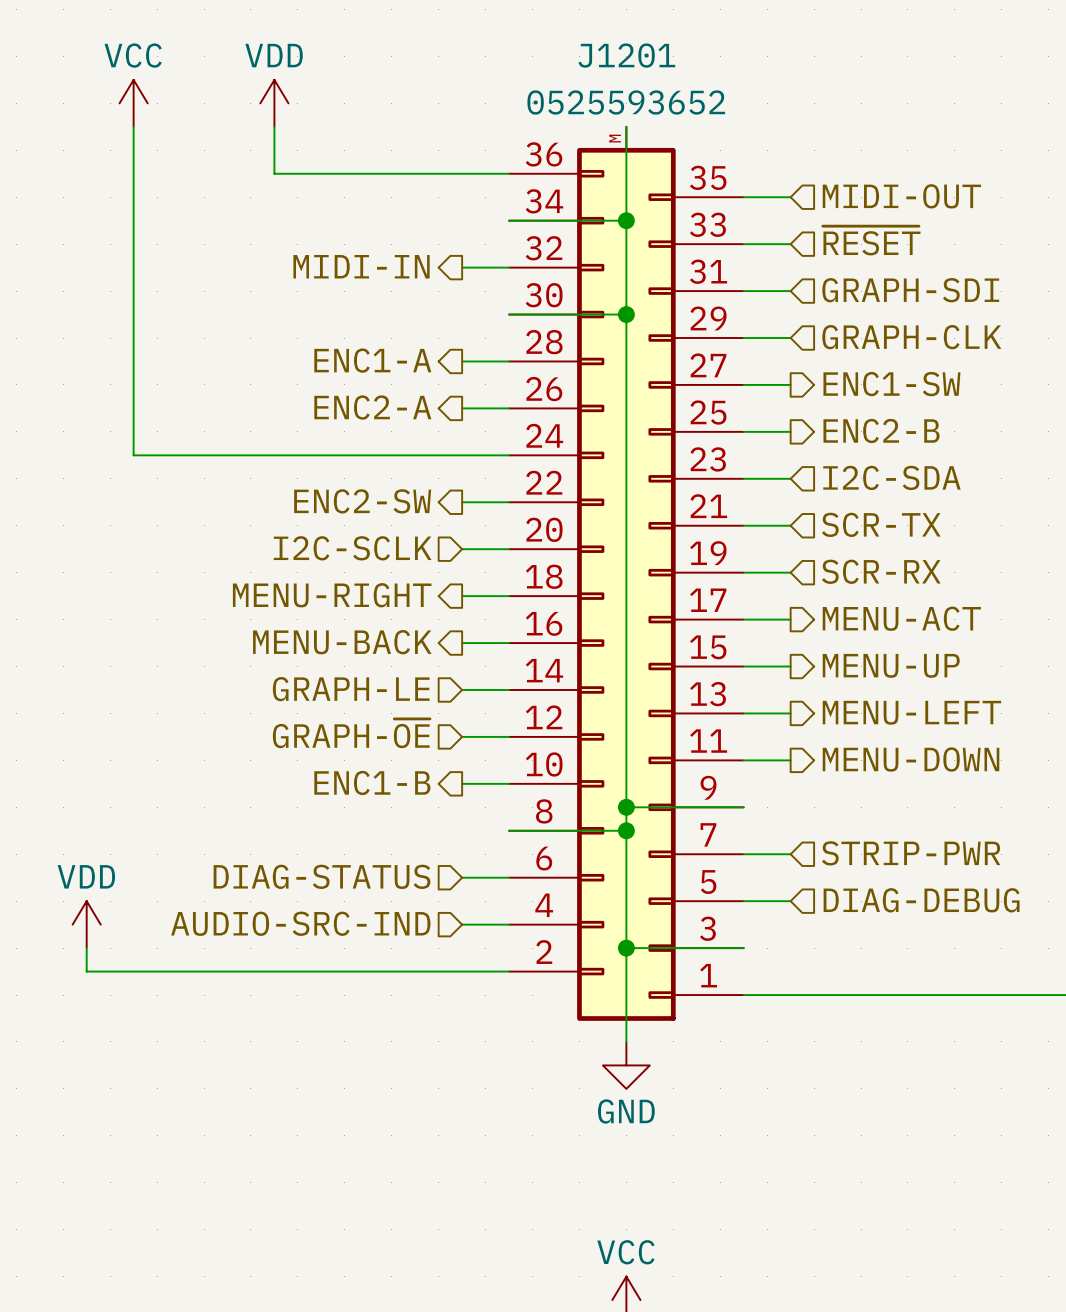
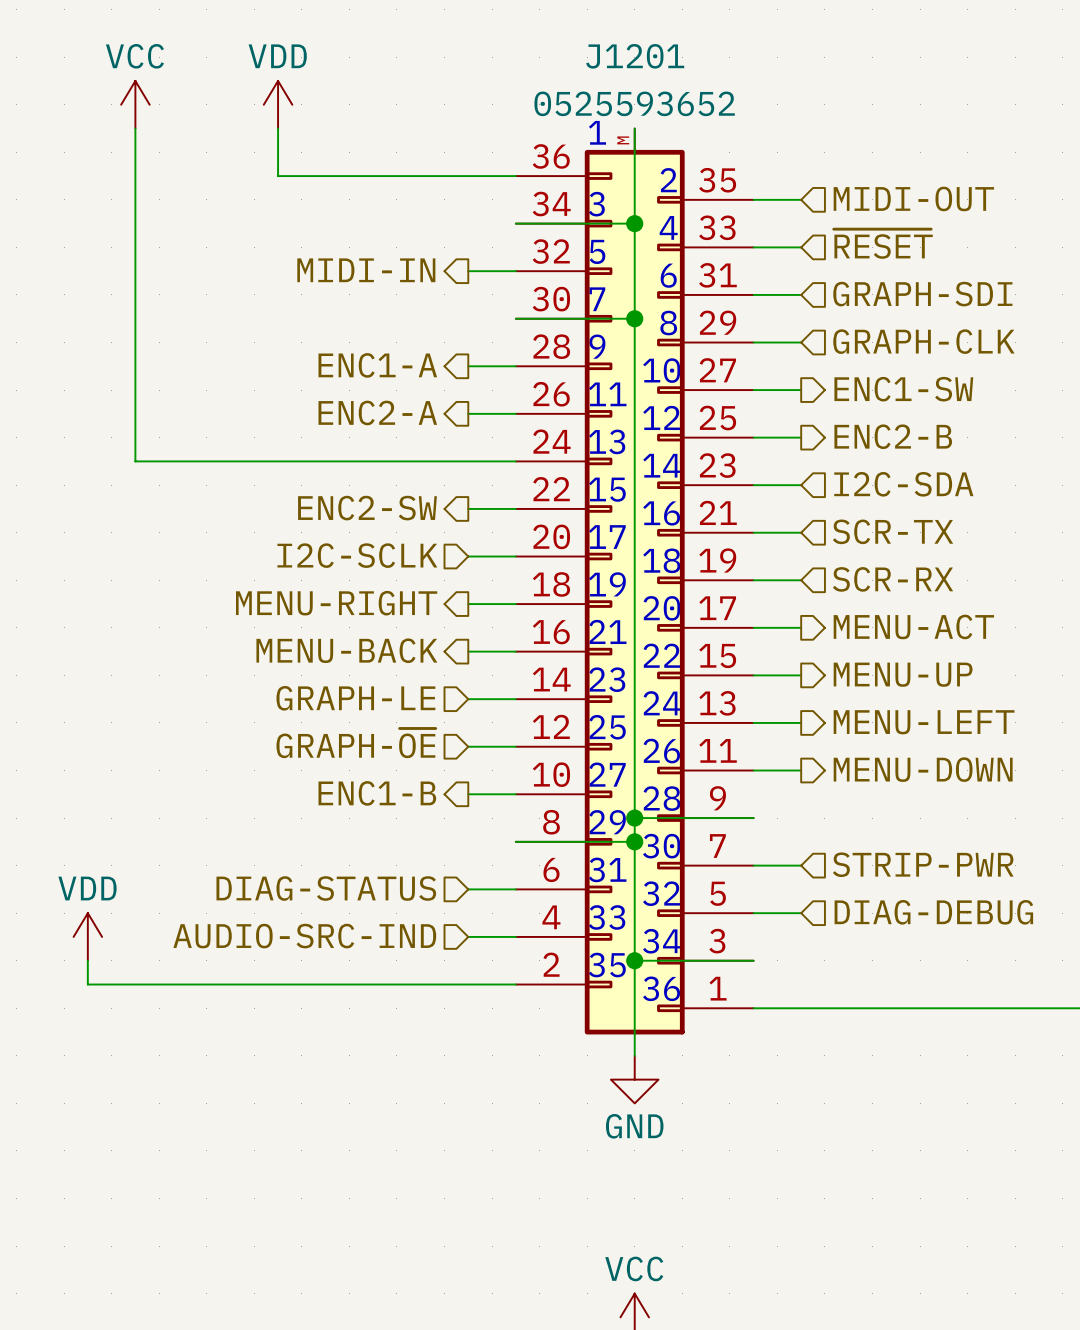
text: none -> 1 (597, 132)
text: none -> 2 (668, 180)
text: none -> 3 (596, 204)
text: none -> 4 (668, 227)
text: none -> 5 (597, 251)
text: none -> 6 (668, 275)
text: none -> 7 (597, 299)
text: none -> 8 (668, 323)
text: none -> 9 (597, 346)
text: none -> 10 (661, 370)
text: none -> 11 (607, 394)
text: none -> 12 (661, 417)
text: none -> 13 (607, 441)
text: none -> 14 (662, 465)
text: none -> 15 (607, 489)
text: none -> 16 (661, 513)
text: none -> 17 (607, 537)
text: none -> 18 (661, 560)
text: none -> 19 (607, 584)
text: none -> 20 (661, 608)
text: none -> 21 (607, 631)
text: none -> 22 (661, 655)
text: none -> 23 (607, 679)
text: none -> 24 (662, 703)
text: none -> 25 (607, 727)
text: none -> 26 (661, 751)
text: none -> 27 (607, 774)
text: none -> 28 (662, 798)
text: none -> 29 (607, 822)
text: none -> 30 (661, 846)
text: none -> 31 (607, 869)
text: none -> 32 (661, 893)
text: none -> 33 (607, 917)
text: none -> 34 (662, 941)
text: none -> 35 (607, 965)
text: none -> 36 (661, 988)

